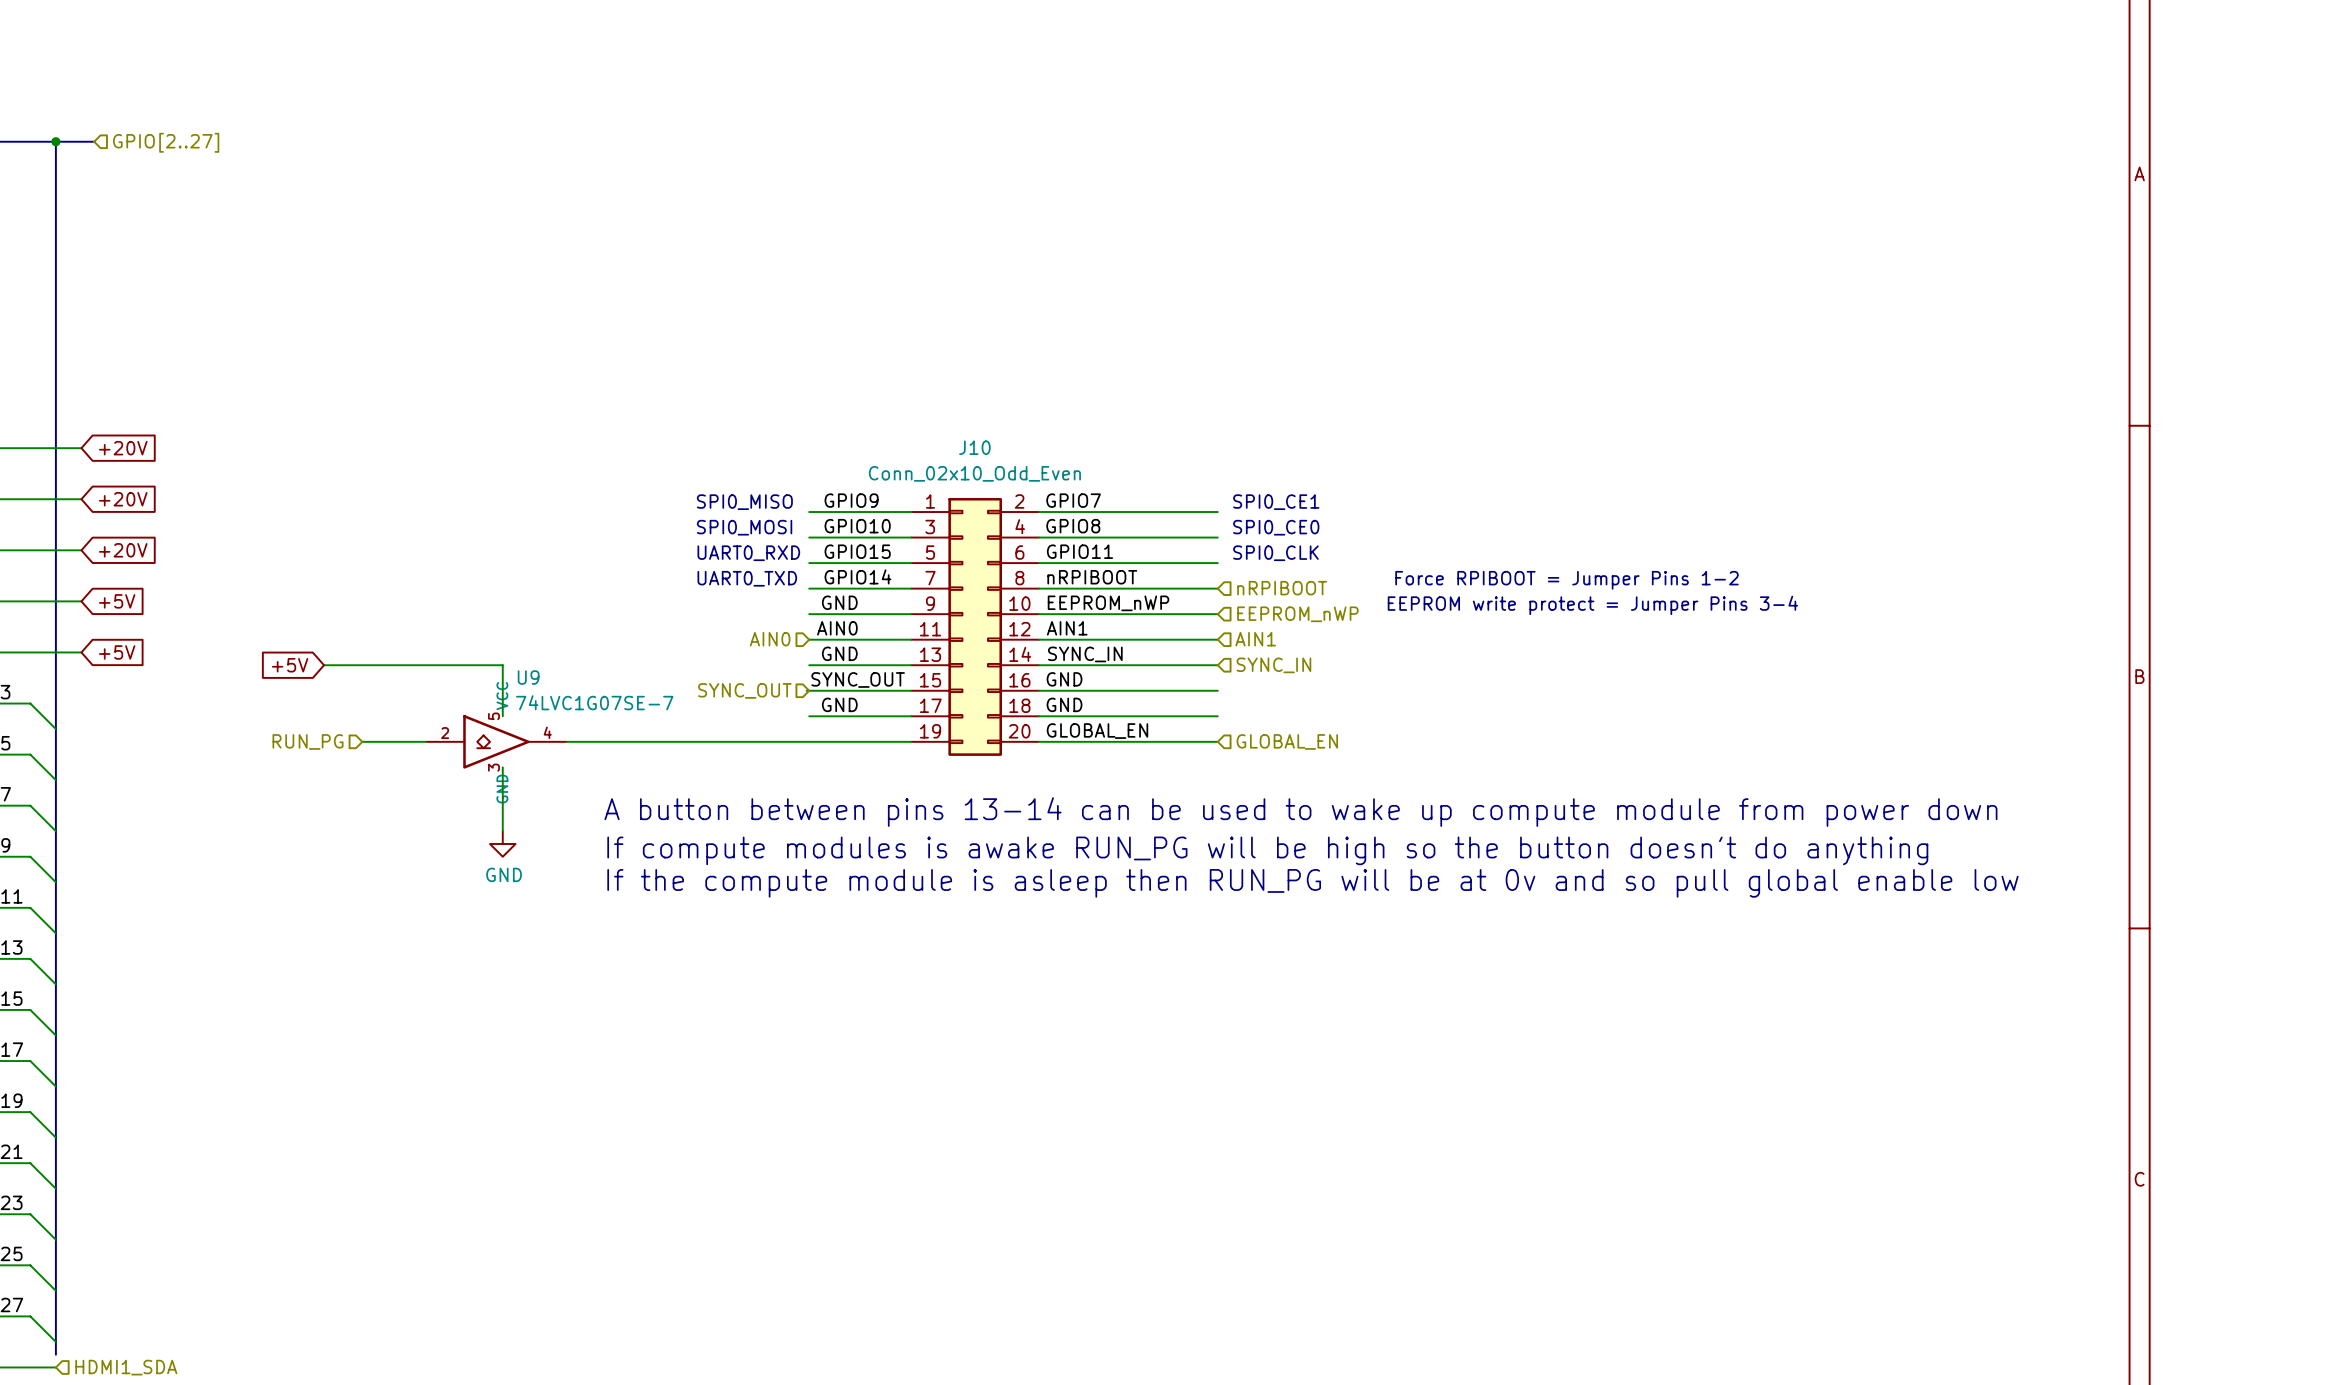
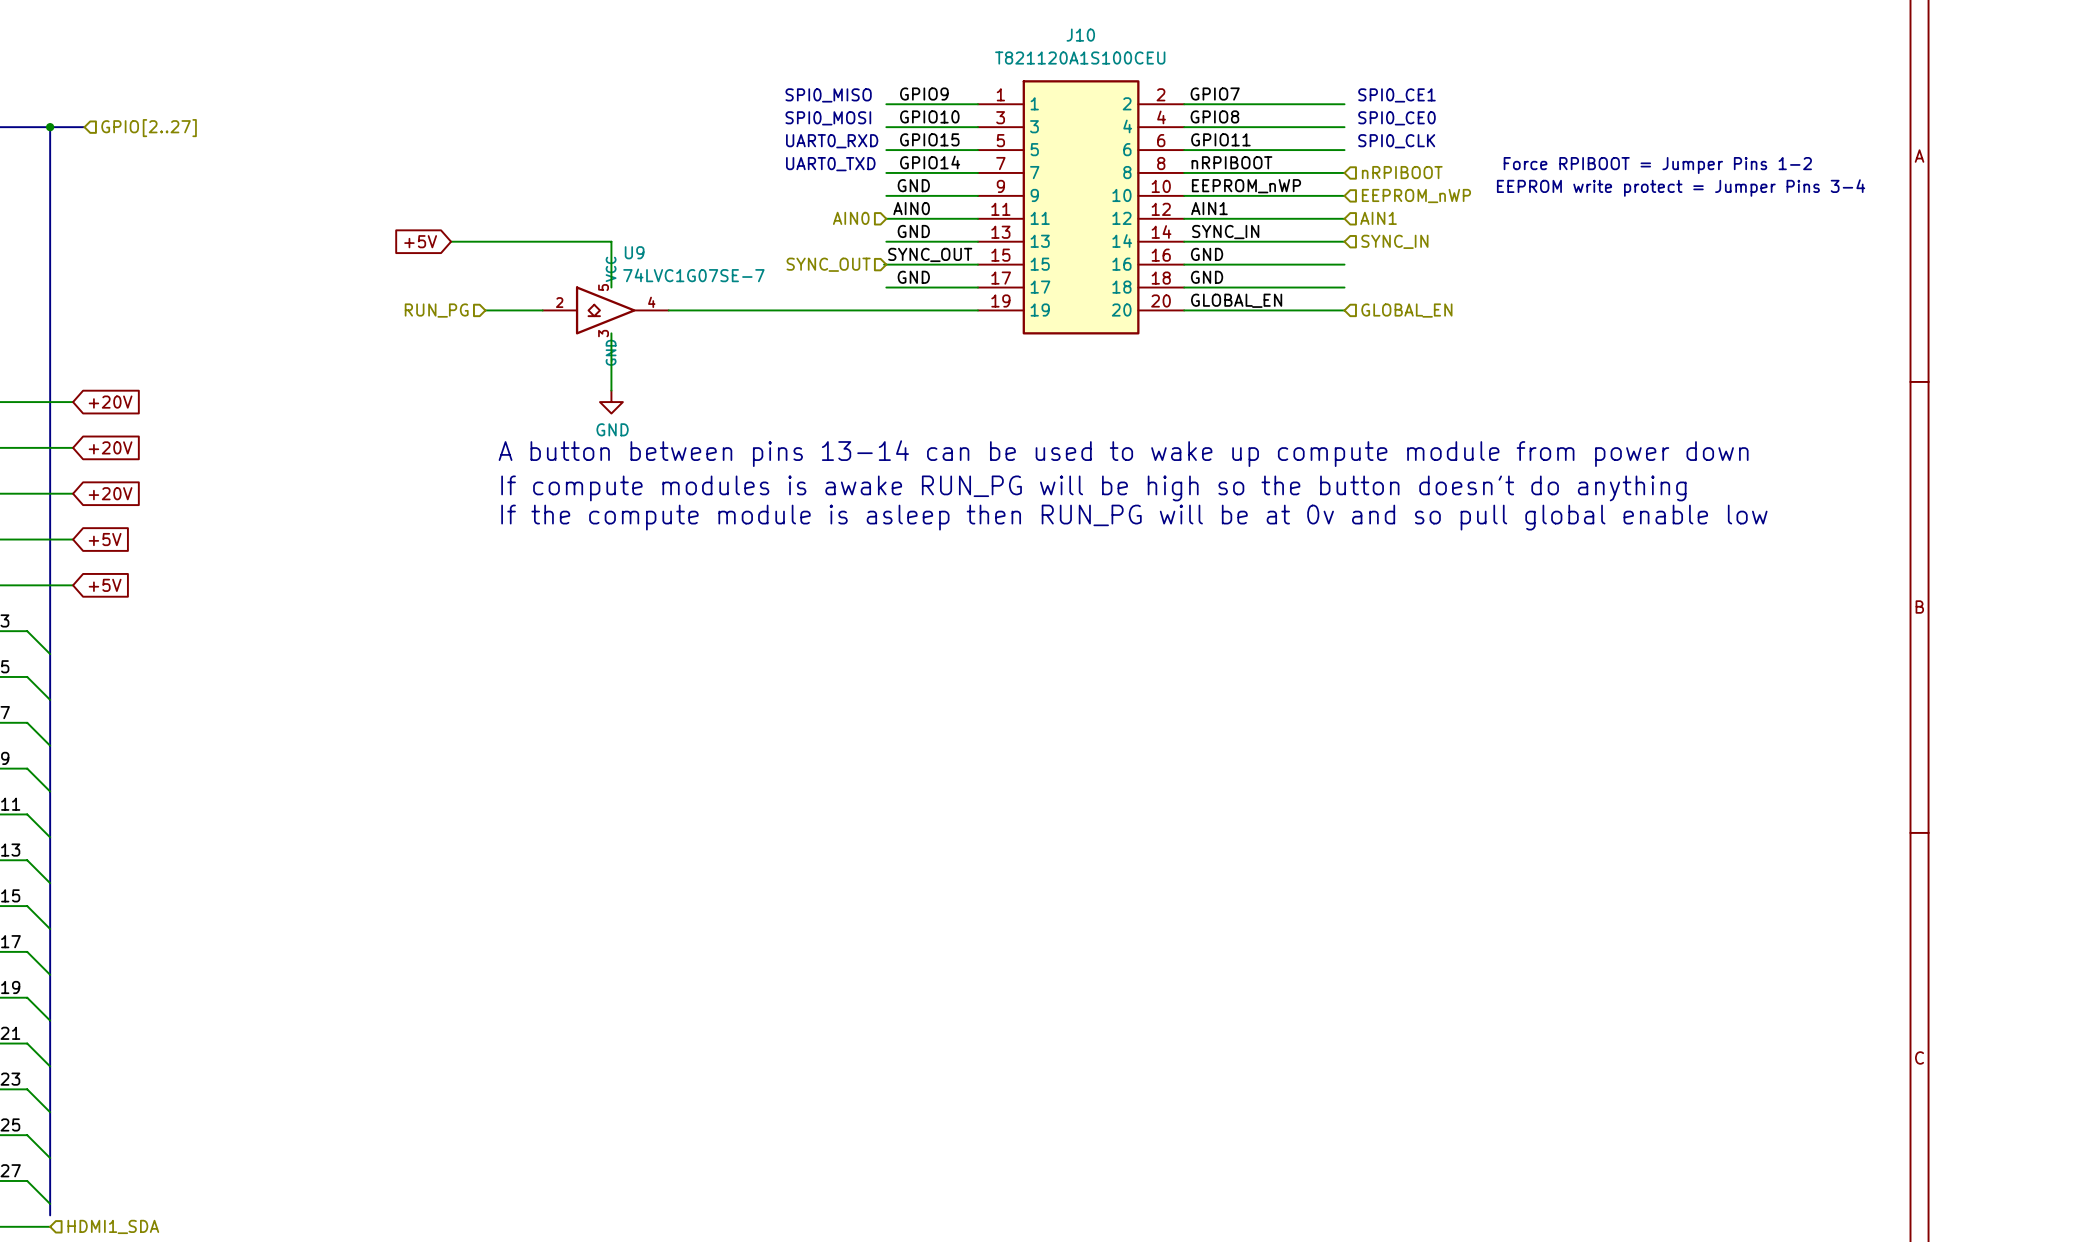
label: none -> GPIO9 (924, 94)
label: none -> GPIO7 (1215, 94)
text: none -> SPI0_MISO (828, 95)
text: none -> SPI0_CE1 (1396, 95)
wire: none -> (886, 104) (977, 104)
wire: none -> (1184, 104) (1344, 104)
label: none -> GPIO10 (929, 116)
label: none -> GPIO8 (1214, 116)
text: none -> SPI0_MOSI (828, 118)
text: none -> SPI0_CE0 (1396, 118)
wire: none -> (886, 127) (977, 127)
wire: none -> (1184, 127) (1344, 127)
label: none -> GPIO15 (929, 139)
label: none -> GPIO11 (1220, 139)
text: none -> UART0_RXD (832, 141)
text: none -> SPI0_CLK (1396, 141)
wire: none -> (886, 150) (977, 150)
wire: none -> (1184, 150) (1344, 150)
label: none -> GPIO14 (930, 162)
label: none -> nRPIBOOT (1231, 162)
text: none -> UART0_TXD (830, 164)
text: none -> Force RPIBOOT = Jumper Pins 1-2 (1657, 165)
wire: none -> (886, 172) (977, 172)
wire: none -> (1184, 172) (1344, 172)
hierarchical label: none -> nRPIBOOT (1402, 172)
label: none -> GND (913, 185)
label: none -> EEPROM_nWP (1246, 186)
text: none -> EEPROM write protect = Jumper Pins 3-4 (1681, 188)
wire: none -> (886, 195) (977, 195)
wire: none -> (1184, 195) (1344, 195)
hierarchical label: none -> EEPROM_nWP (1416, 196)
label: none -> AIN0 (911, 208)
label: none -> AIN1 (1209, 208)
hierarchical label: none -> AIN0 (851, 218)
wire: none -> (886, 218) (977, 218)
wire: none -> (1184, 218) (1344, 218)
hierarchical label: none -> AIN1 (1378, 218)
label: none -> GND (913, 231)
label: none -> SYNC_IN (1225, 232)
global label: none -> +5V (420, 241)
wire: none -> (451, 241) (611, 241) (611, 287)
wire: none -> (886, 241) (977, 241)
wire: none -> (1184, 241) (1344, 241)
hierarchical label: none -> SYNC_IN (1394, 241)
label: none -> GND (1207, 254)
label: none -> SYNC_OUT (930, 254)
wire: none -> (884, 264) (977, 264)
wire: none -> (1184, 264) (1344, 264)
hierarchical label: none -> SYNC_OUT (828, 264)
label: none -> GND (913, 277)
label: none -> GND (1207, 277)
wire: none -> (886, 287) (977, 287)
wire: none -> (1184, 287) (1344, 287)
label: none -> GLOBAL_EN (1236, 300)
hierarchical label: none -> RUN_PG (436, 310)
wire: none -> (485, 310) (542, 310)
wire: none -> (668, 310) (977, 310)
wire: none -> (1184, 310) (1344, 310)
hierarchical label: none -> GLOBAL_EN (1406, 310)
wire: none -> (611, 333) (611, 390)
power symbol: none -> GND (611, 402)
J10 value: Conn_02x10_Odd_Even (974, 473) -> T821120A1S100CEU (1080, 58)
J10 symbol: [911, 497, 1040, 756] -> [977, 80, 1185, 335]
label: GPIO9 (851, 500) -> none
label: GPIO7 (1073, 500) -> none
text: SPI0_MISO (744, 502) -> none
text: SPI0_CE1 (1276, 502) -> none
text: none -> A button between pins 13-14 can be used to wake up compute module from power down (1123, 453)
wire: (809, 512) (911, 512) -> none
wire: (1039, 512) (1217, 512) -> none
label: GPIO10 (857, 526) -> none
label: GPIO8 (1073, 526) -> none
text: SPI0_MOSI (744, 527) -> none
text: SPI0_CE0 (1276, 527) -> none
wire: (809, 537) (911, 537) -> none
wire: (1039, 537) (1217, 537) -> none
text: none -> If compute modules is awake RUN_PG will be high so the button doesn't do anything (1093, 488)
label: GPIO15 (857, 551) -> none
label: GPIO11 (1079, 551) -> none
text: UART0_RXD (748, 553) -> none
text: SPI0_CLK (1275, 553) -> none
wire: (809, 563) (911, 563) -> none
wire: (1039, 563) (1217, 563) -> none
label: GPIO14 (857, 576) -> none
text: none -> If the compute module is asleep then RUN_PG will be at 0v and so pull global enable low (1134, 517)
label: nRPIBOOT (1092, 577) -> none
text: UART0_TXD (747, 578) -> none
text: Force RPIBOOT = Jumper Pins 1-2 (1566, 580) -> none
wire: (809, 588) (911, 588) -> none
wire: (1039, 588) (1217, 588) -> none
hierarchical label: nRPIBOOT (1282, 588) -> none
label: GND (839, 602) -> none
label: EEPROM_nWP (1108, 603) -> none
text: EEPROM write protect = Jumper Pins 3-4 (1592, 605) -> none
wire: (809, 614) (911, 614) -> none
wire: (1039, 614) (1217, 614) -> none
hierarchical label: EEPROM_nWP (1297, 614) -> none
label: AIN0 (837, 628) -> none
label: AIN1 (1067, 628) -> none
hierarchical label: AIN0 (770, 639) -> none
wire: (809, 639) (911, 639) -> none
wire: (1039, 639) (1217, 639) -> none
hierarchical label: AIN1 (1255, 639) -> none
label: GND (839, 653) -> none
label: SYNC_IN (1085, 654) -> none
global label: +5V (290, 665) -> none
wire: (324, 665) (502, 665) (502, 716) -> none
wire: (809, 665) (911, 665) -> none
wire: (1039, 665) (1217, 665) -> none
hierarchical label: SYNC_IN (1273, 665) -> none
label: SYNC_OUT (858, 679) -> none
label: GND (1064, 679) -> none
hierarchical label: SYNC_OUT (744, 690) -> none
wire: (806, 690) (911, 690) -> none
wire: (1039, 690) (1217, 690) -> none
label: GND (839, 704) -> none
label: GND (1064, 704) -> none
wire: (809, 716) (911, 716) -> none
wire: (1039, 716) (1217, 716) -> none
label: GLOBAL_EN (1097, 731) -> none
hierarchical label: RUN_PG (308, 741) -> none
wire: (362, 741) (426, 741) -> none
U9 position: (496, 741) -> (605, 310)
wire: (566, 741) (911, 741) -> none
wire: (1039, 741) (1217, 741) -> none
hierarchical label: GLOBAL_EN (1287, 741) -> none
wire: (502, 767) (502, 831) -> none
text: A button between pins 13-14 can be used to wake up compute module from power down (1300, 812) -> none
power symbol: GND (502, 843) -> none
text: If compute modules is awake RUN_PG will be high so the button doesn't do anything (1267, 850) -> none
text: If the compute module is asleep then RUN_PG will be at 0v and so pull global enable low (1312, 883) -> none

